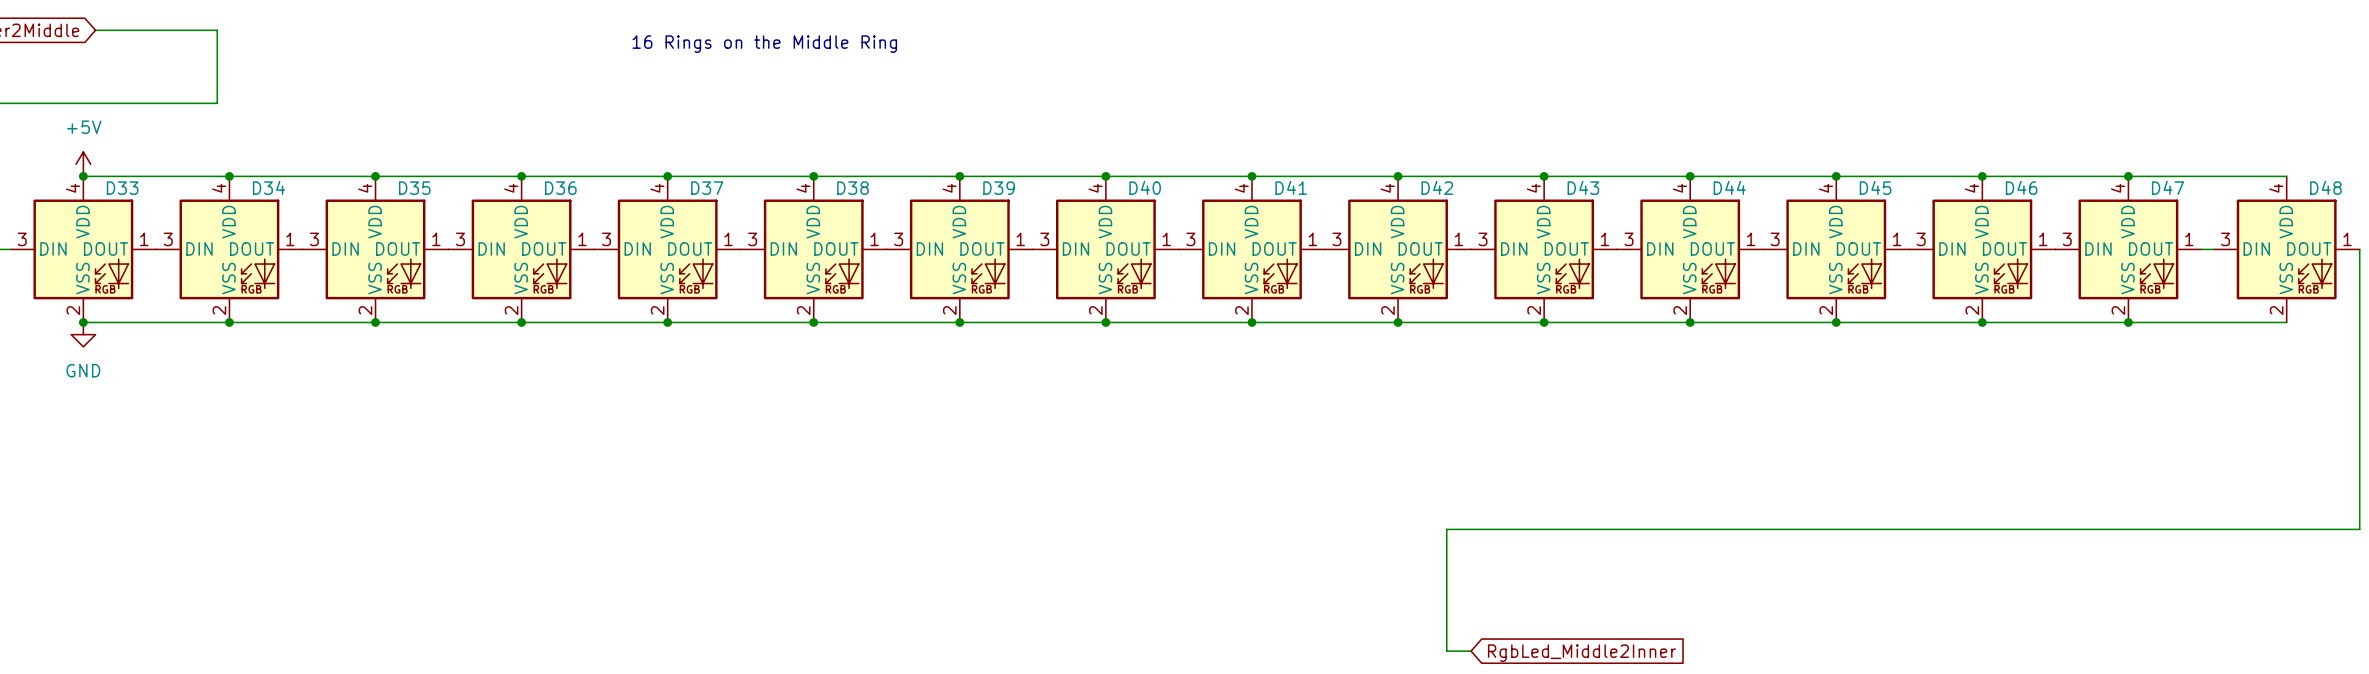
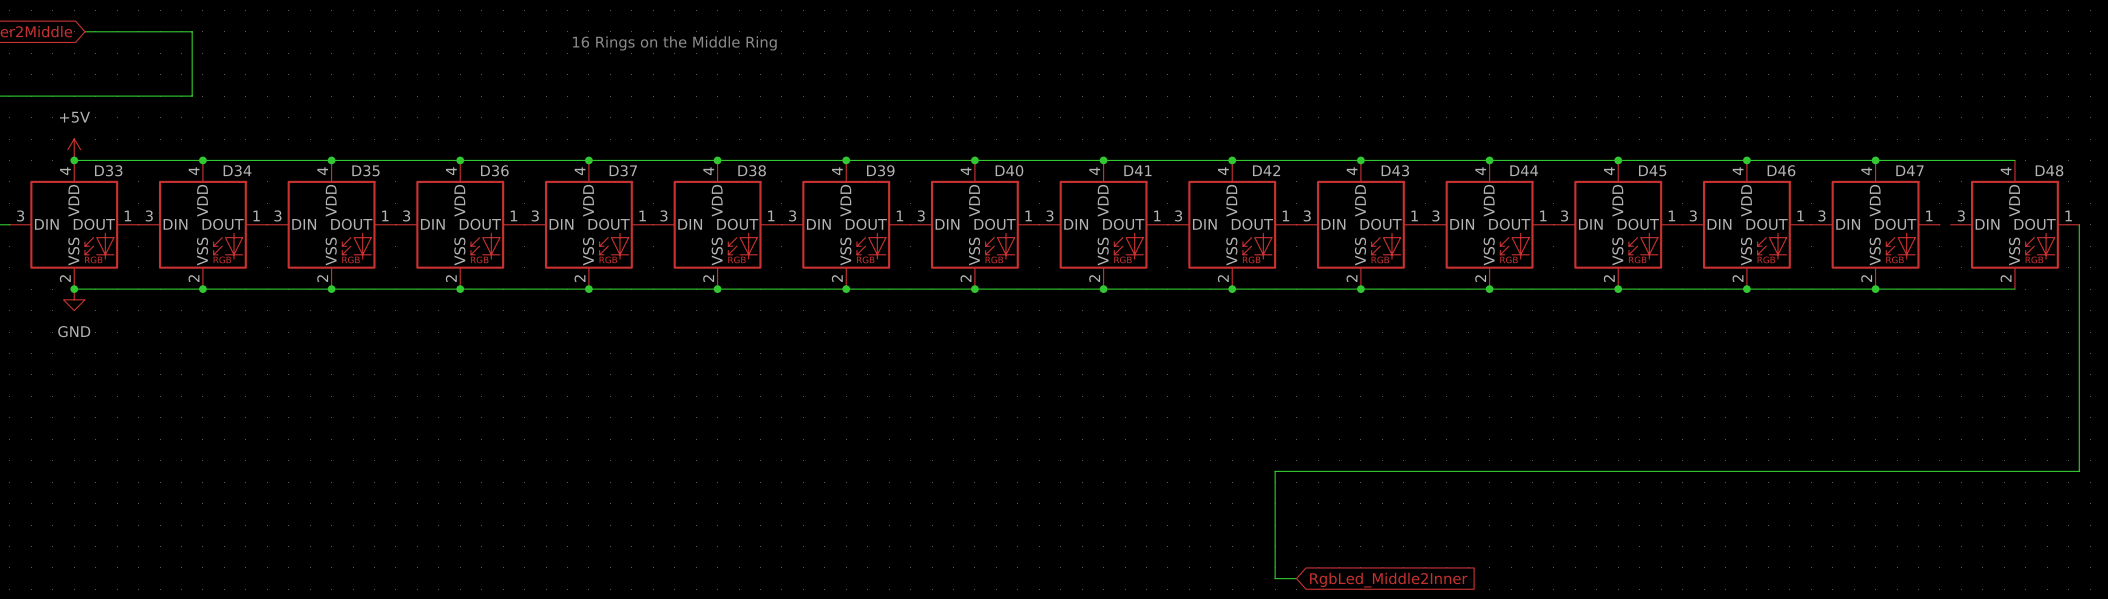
wire: (2201, 249) (2213, 249) -> none

